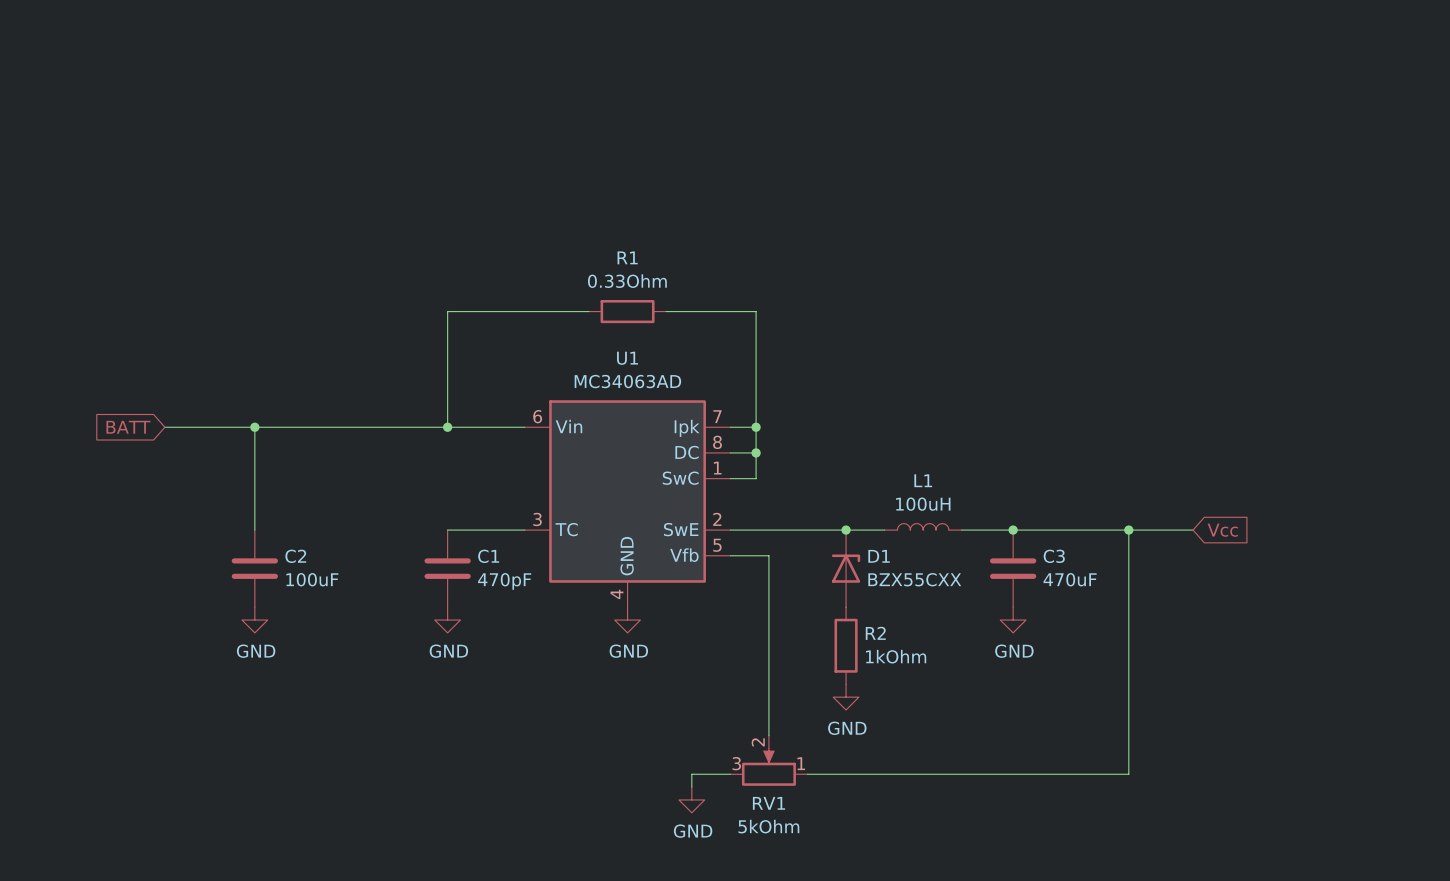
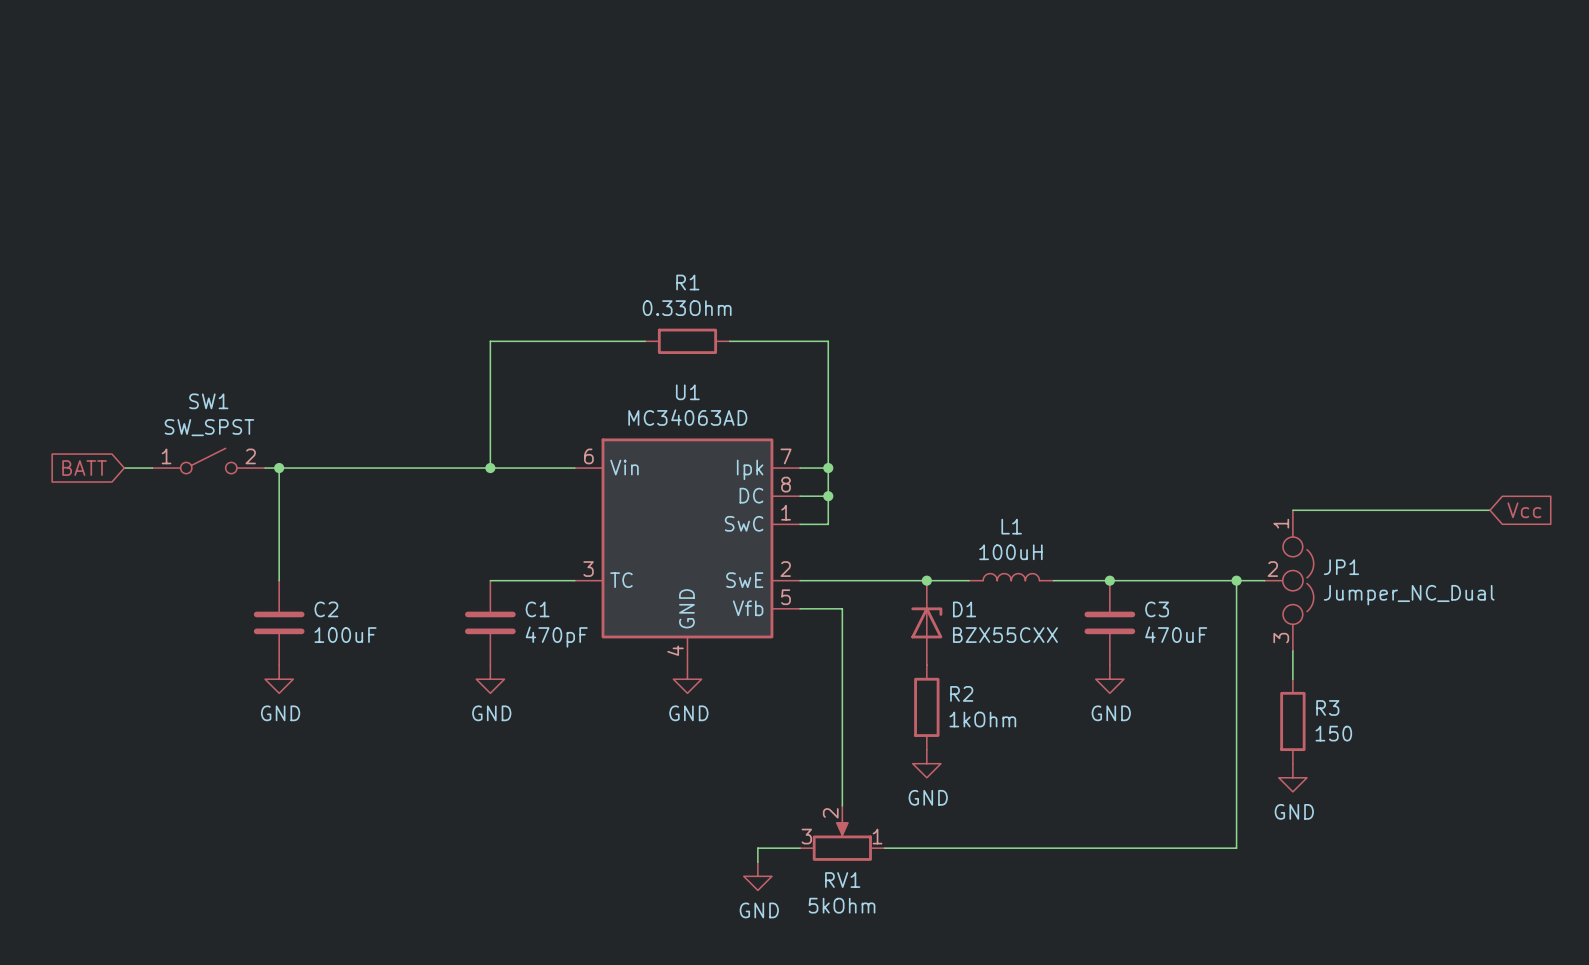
SW1: none -> SW_SPST (208, 461)
wire: none -> (124, 468) (152, 468)
global label position: BATT (128, 427) -> BATT (84, 468)
wire: (164, 427) (241, 427) -> none
wire: none -> (1292, 510) (1489, 510)
wire: (1154, 530) (1193, 530) -> none
JP1: none -> Jumper_NC_Dual (1289, 580)
global label position: Vcc (1222, 530) -> Vcc (1524, 510)
wire: none -> (1292, 651) (1292, 679)
R3: none -> 150 (1292, 721)
power symbol: none -> GND (1292, 777)

